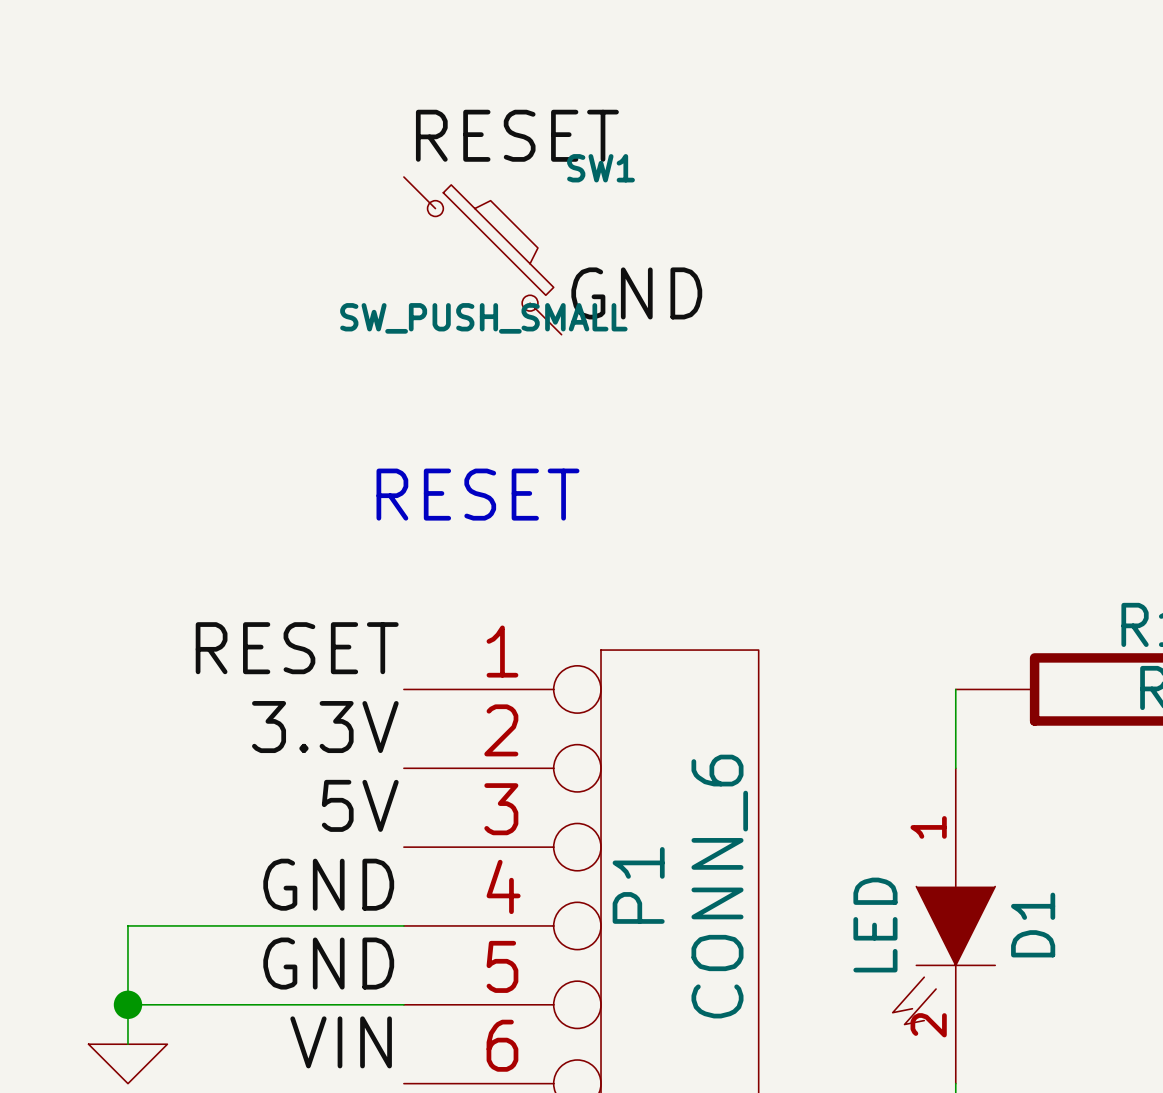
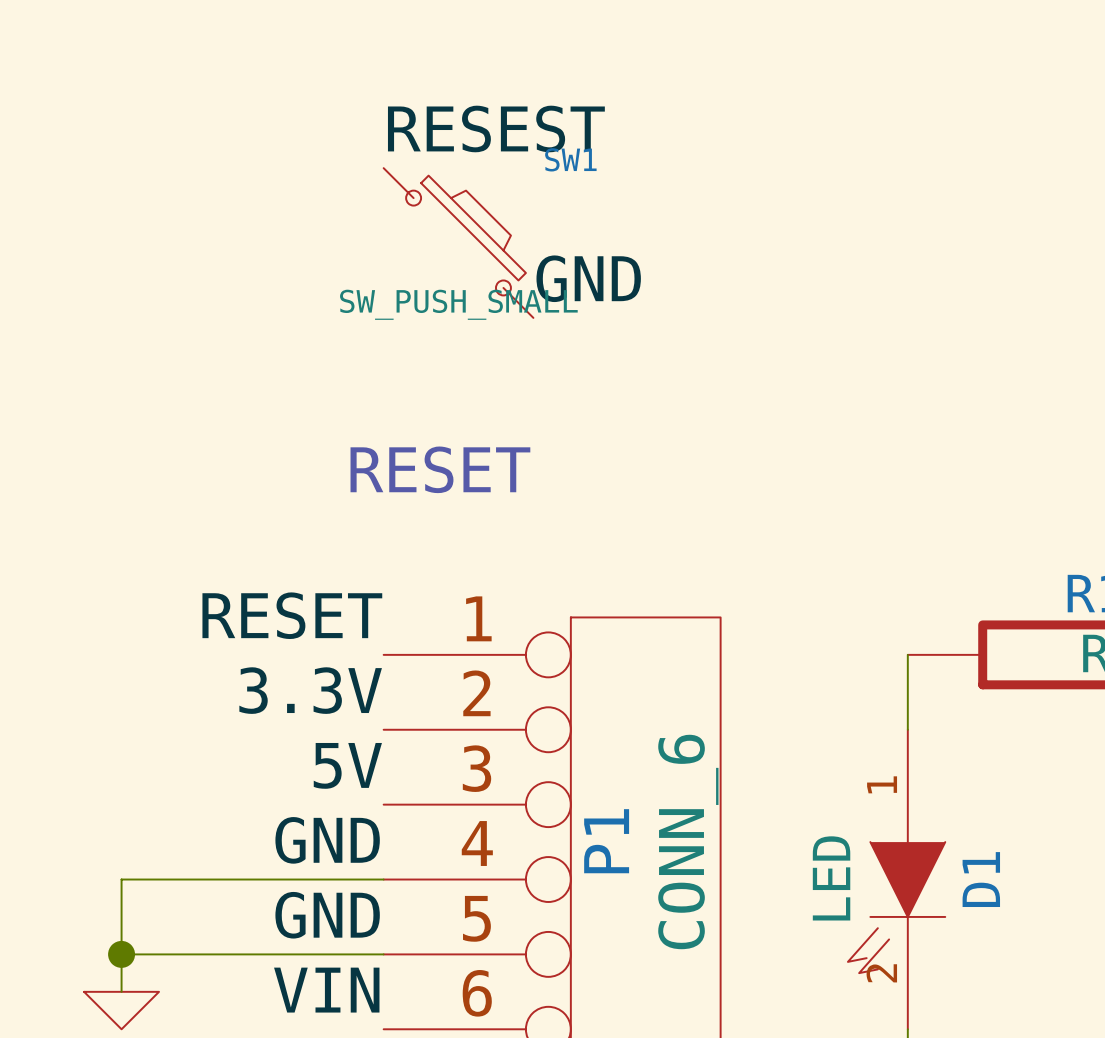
label: RESET (517, 135) -> RESEST (496, 128)

